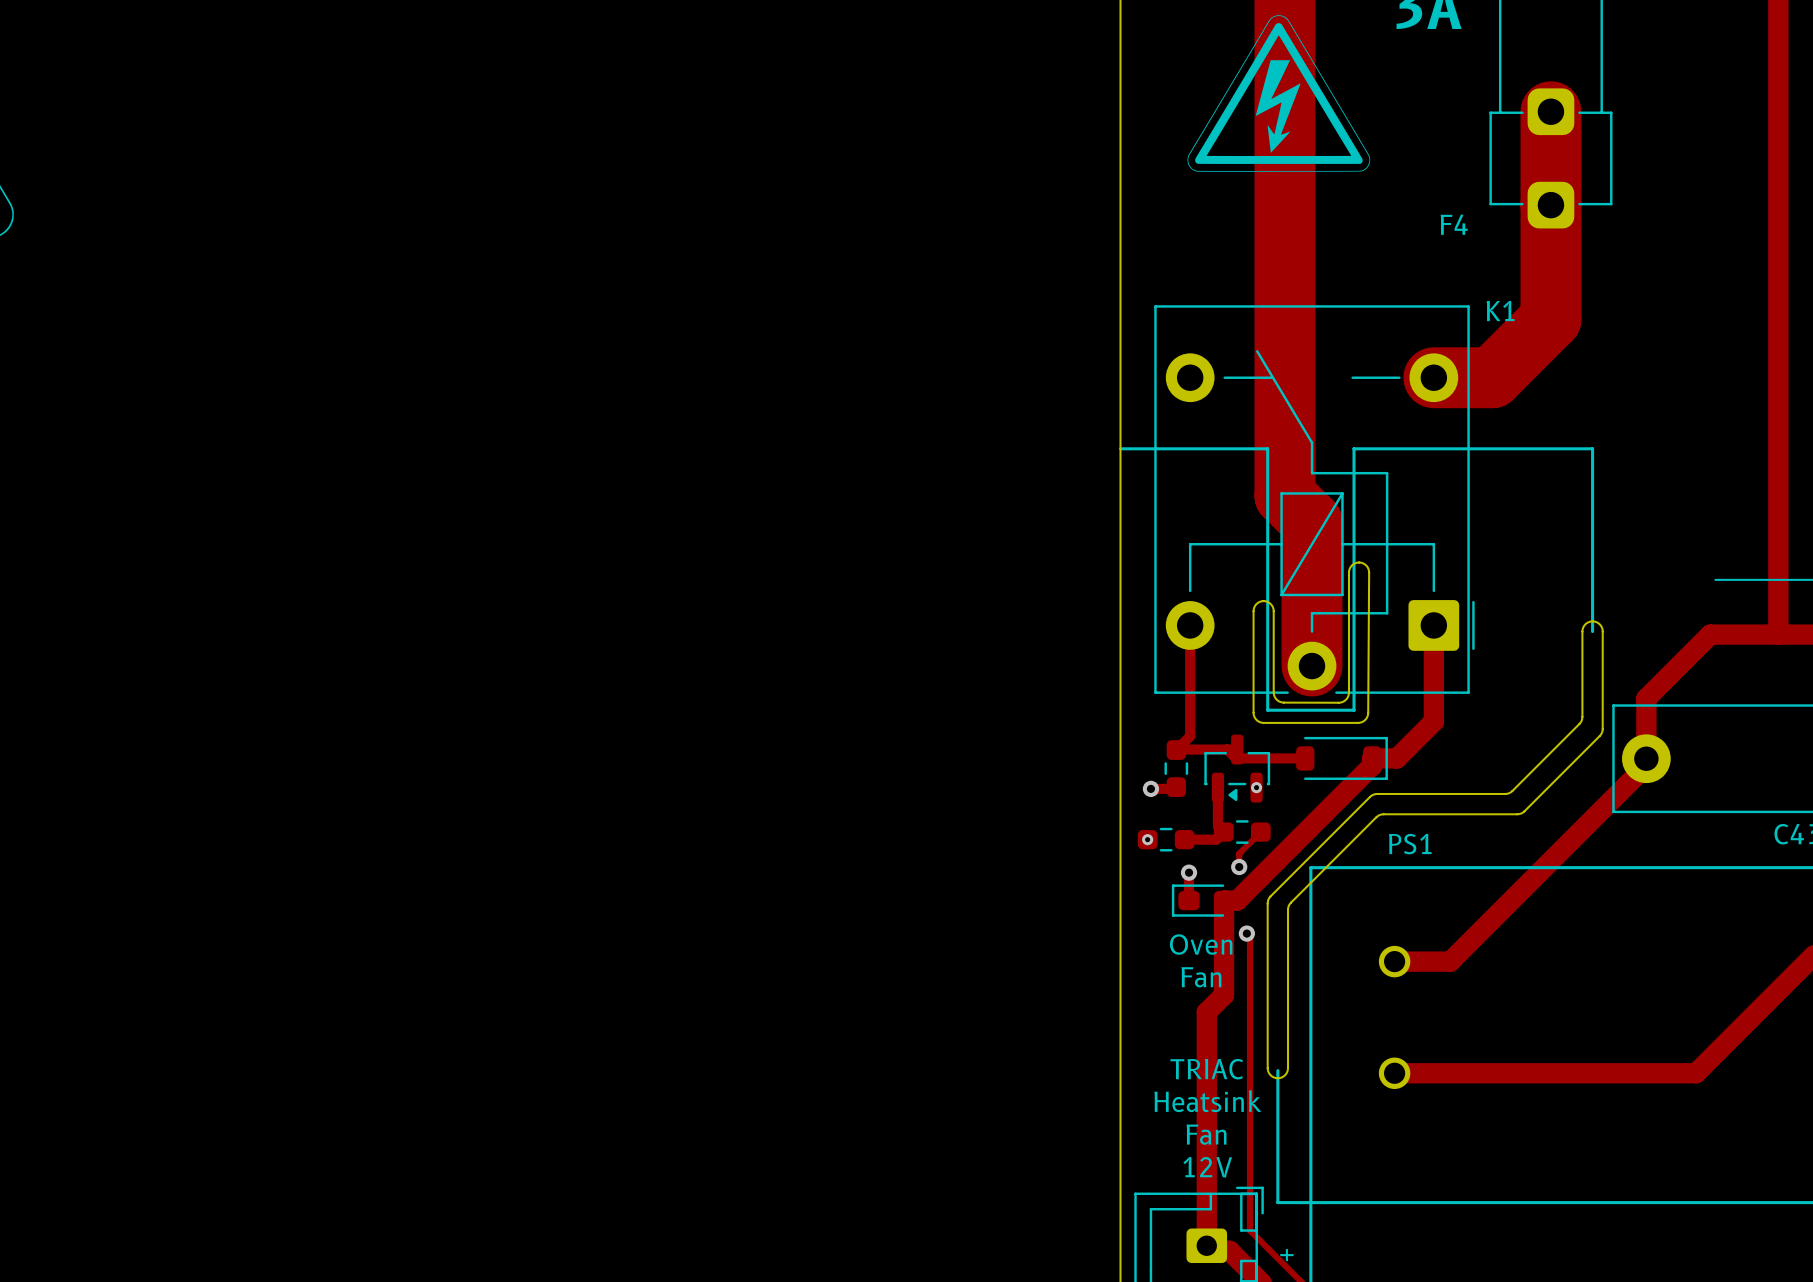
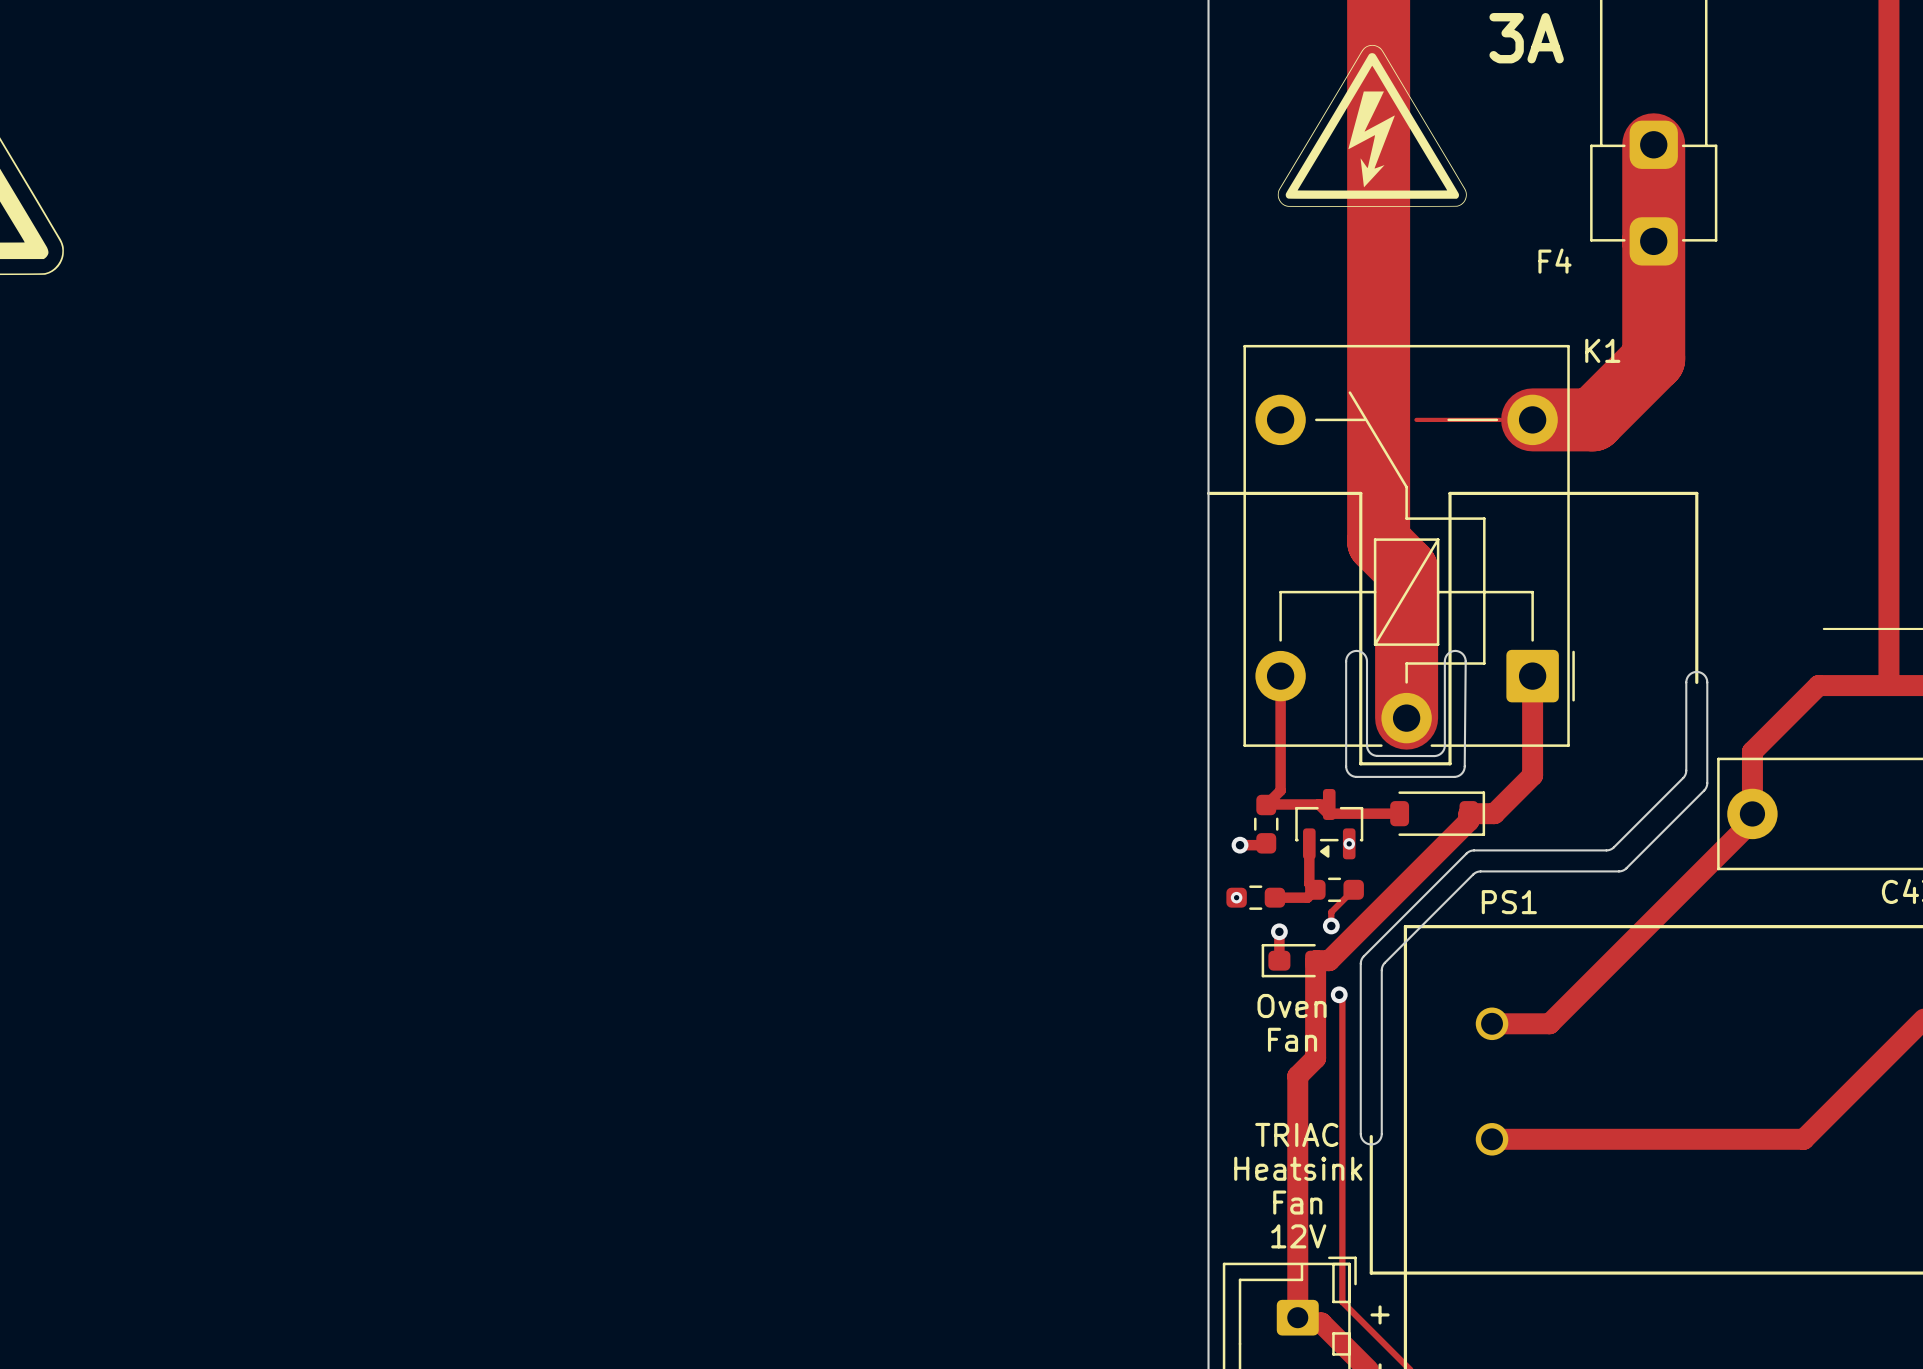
track: none -> (1416, 419) (1500, 419)
board edge: (1348, 611) (1349, 570) (1354, 563) (1361, 562) (1367, 566) (1369, 572) (1368, 712) -> (1444, 661) (1447, 653) (1453, 651) (1461, 653) (1465, 660) (1464, 766)

